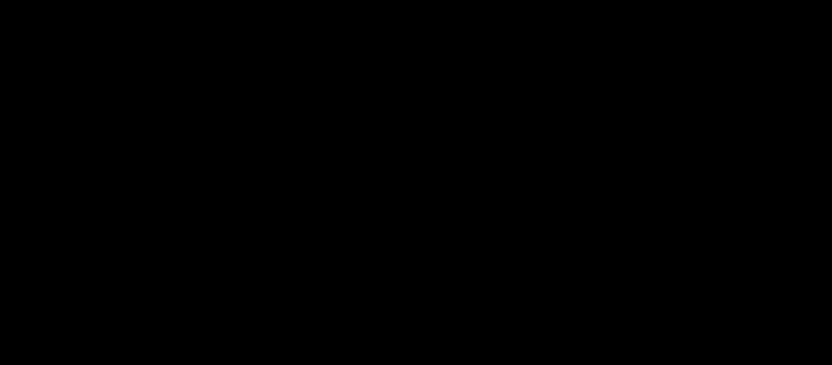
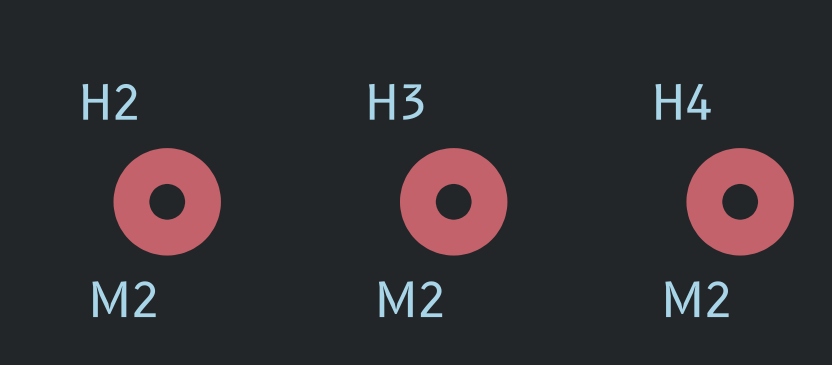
H2: none -> M2 (167, 201)
H3: none -> M2 (453, 201)
H4: none -> M2 (740, 201)

